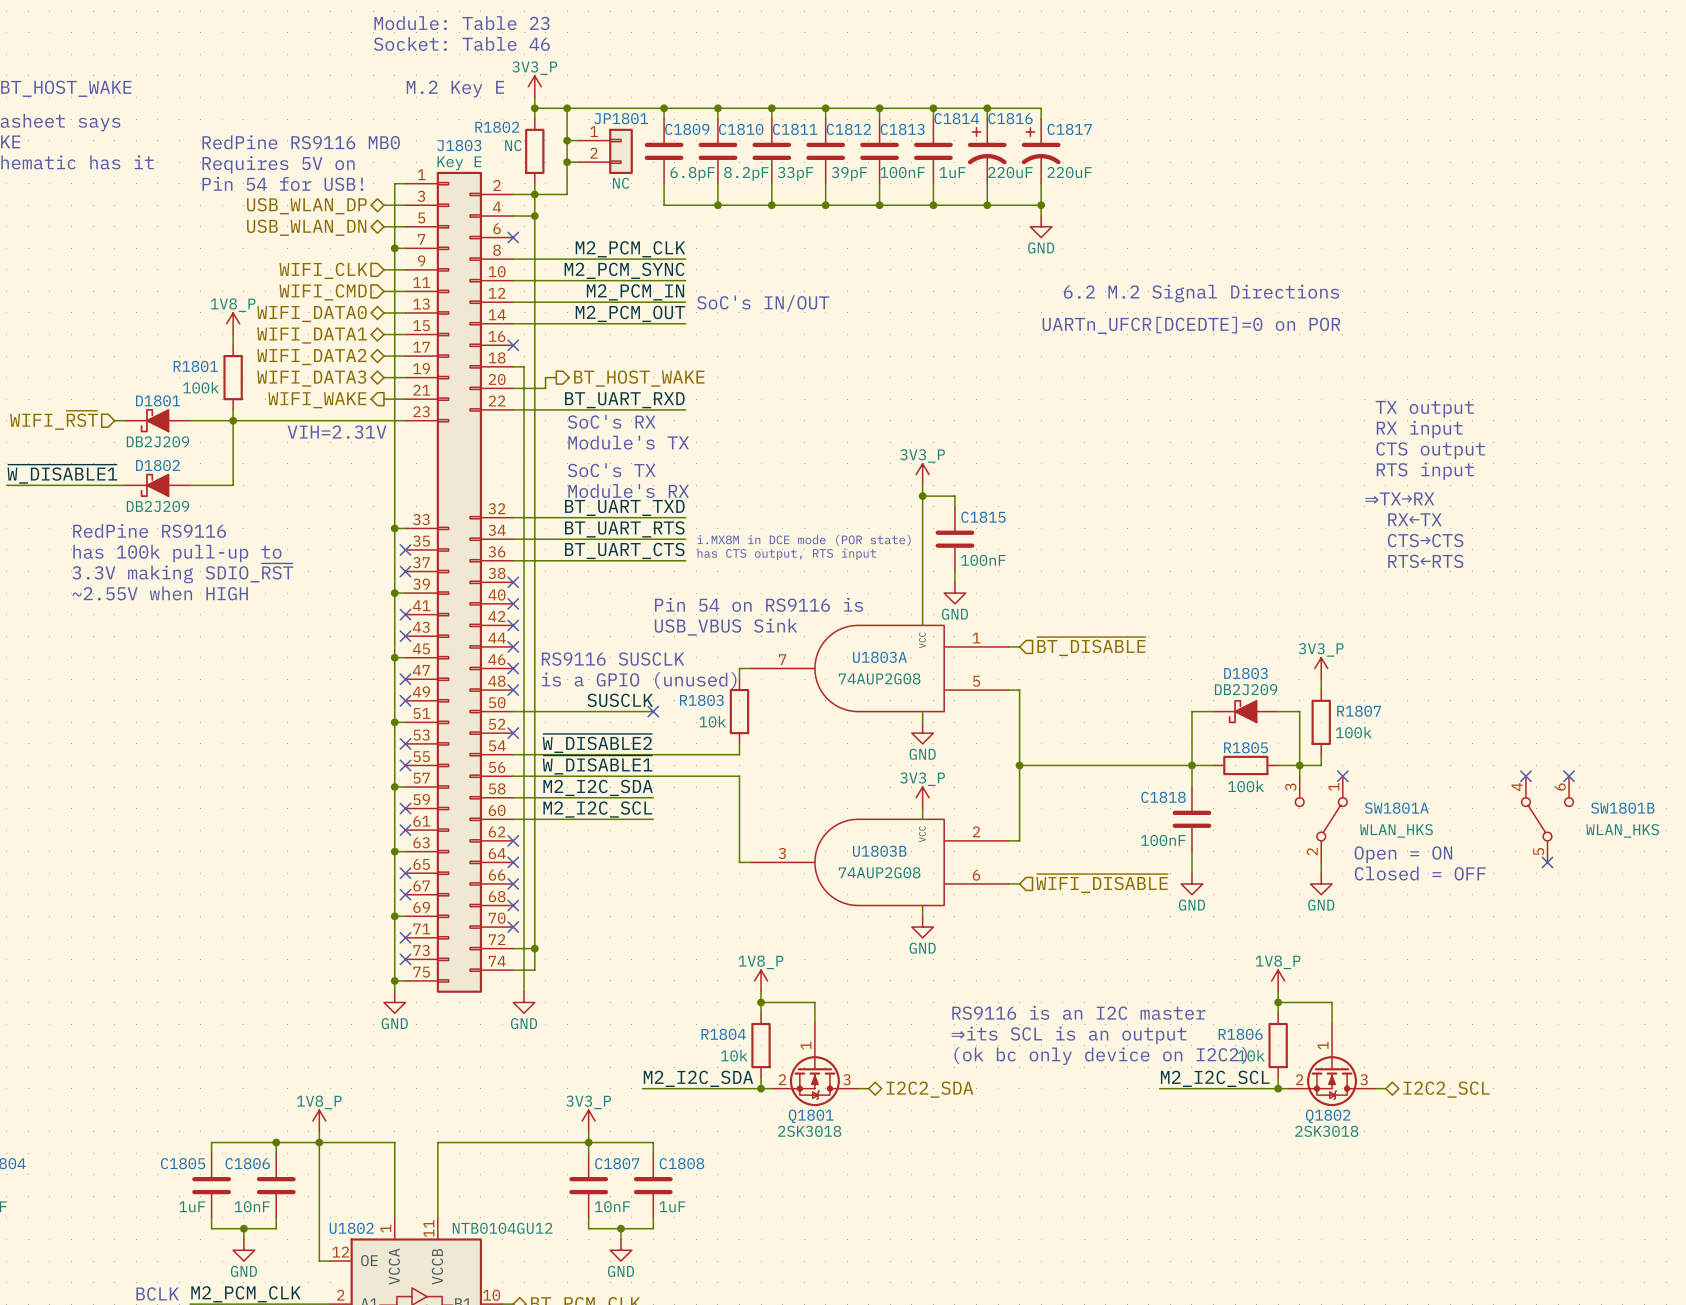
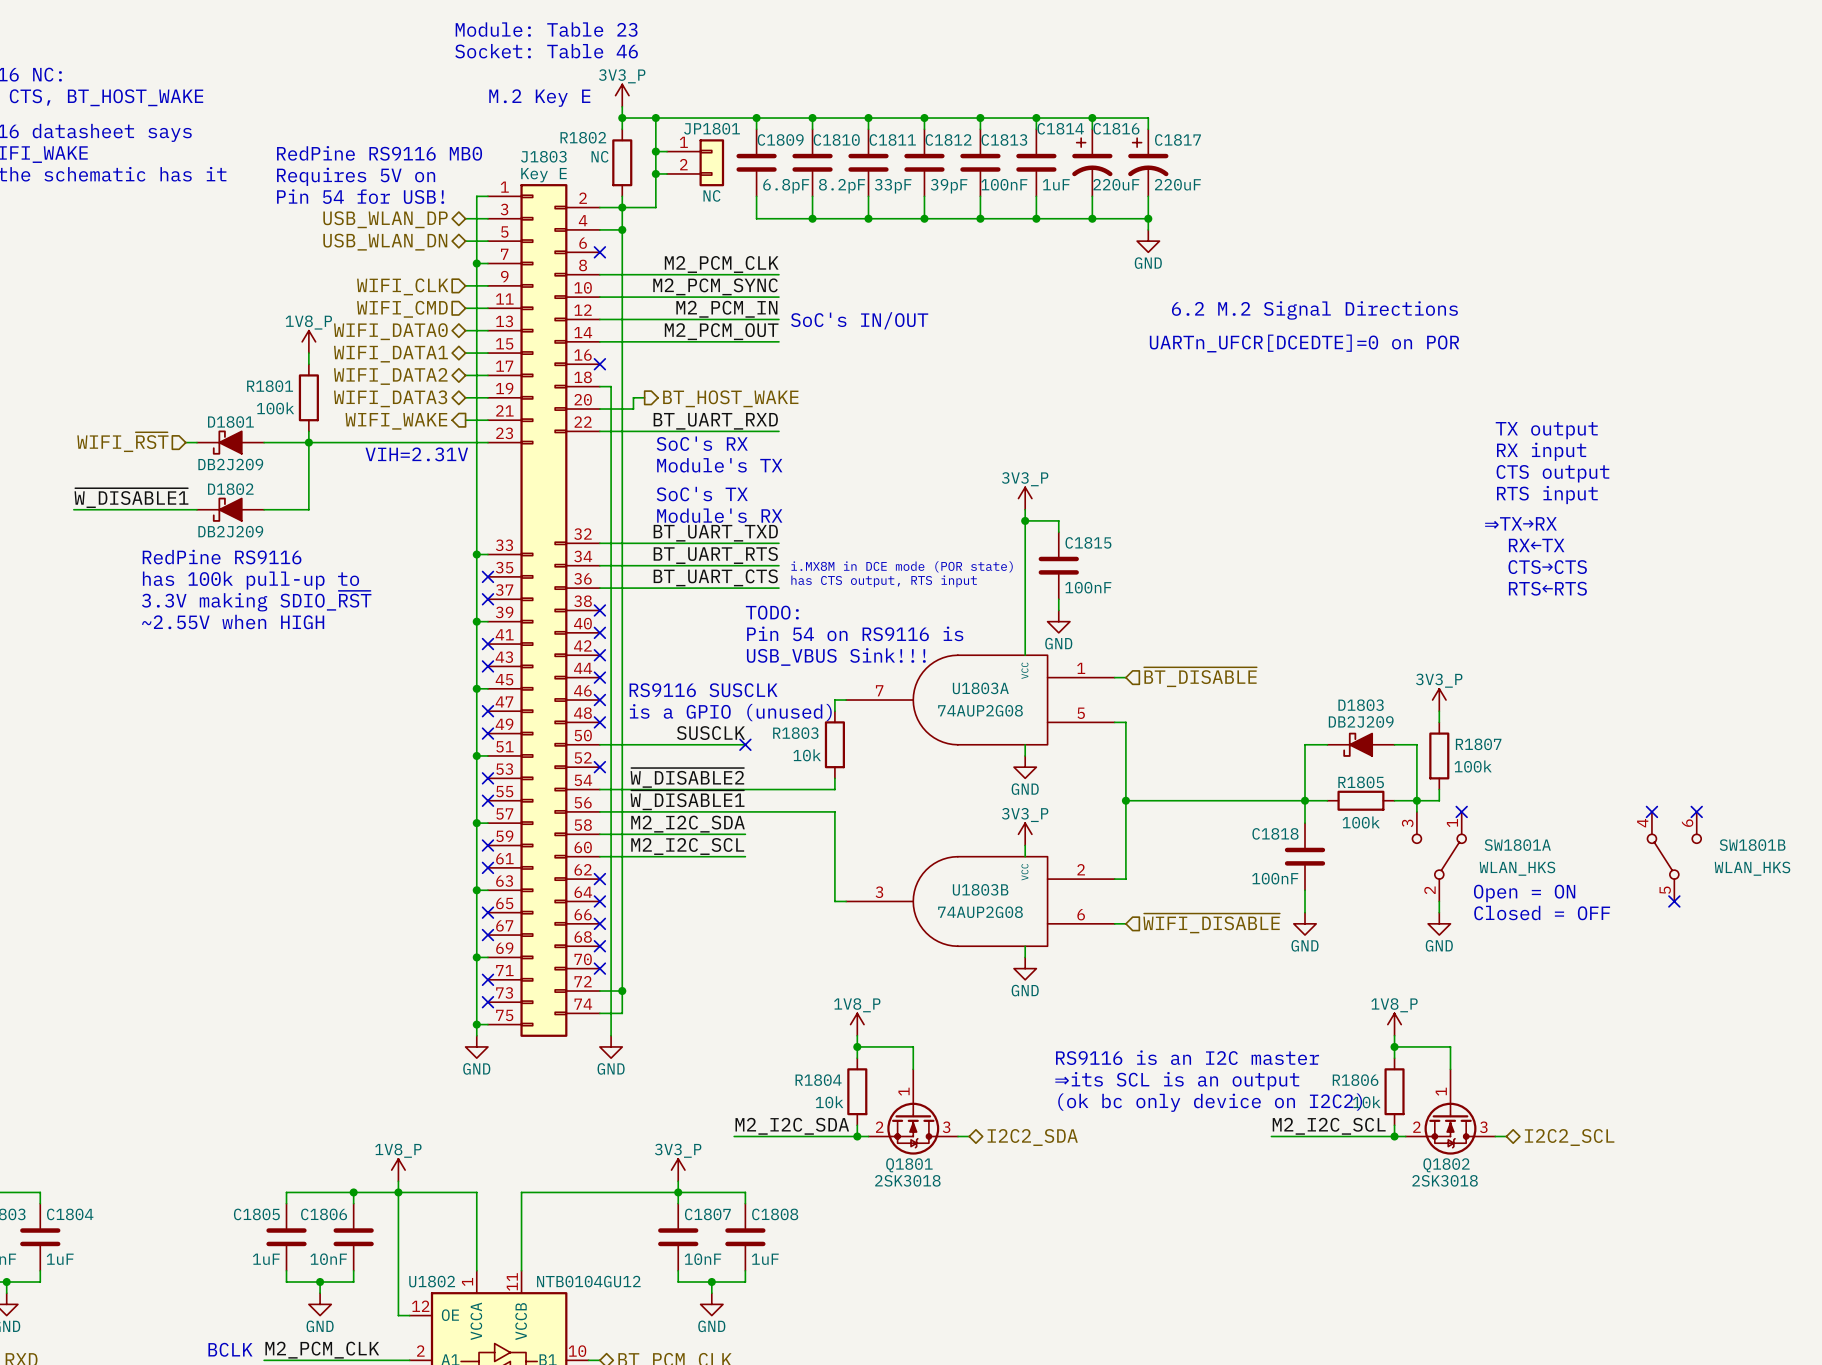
text: none -> TODO: (772, 612)
text: USB_VBUS Sink (726, 627) -> USB_VBUS Sink!!! (836, 657)

